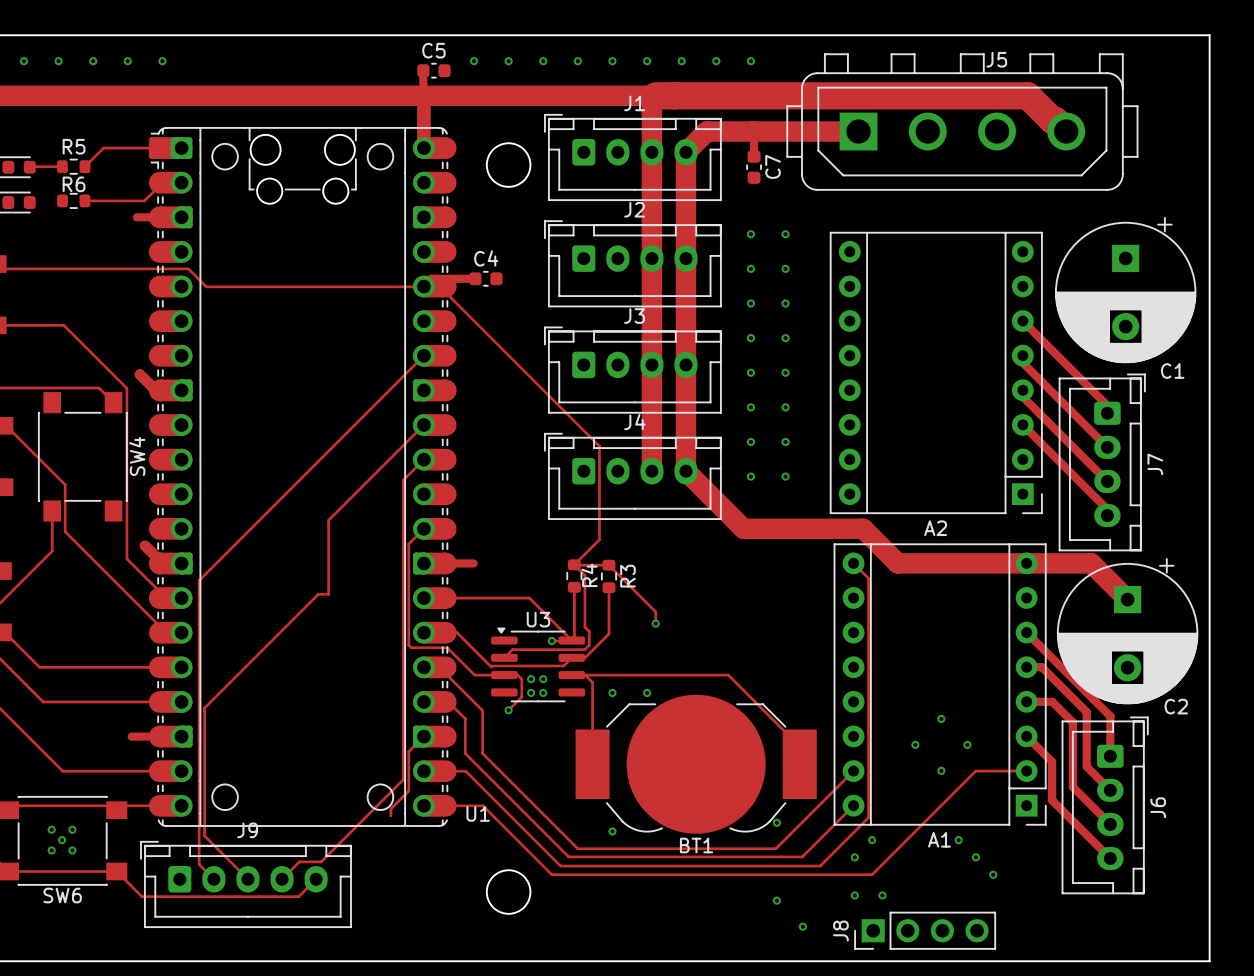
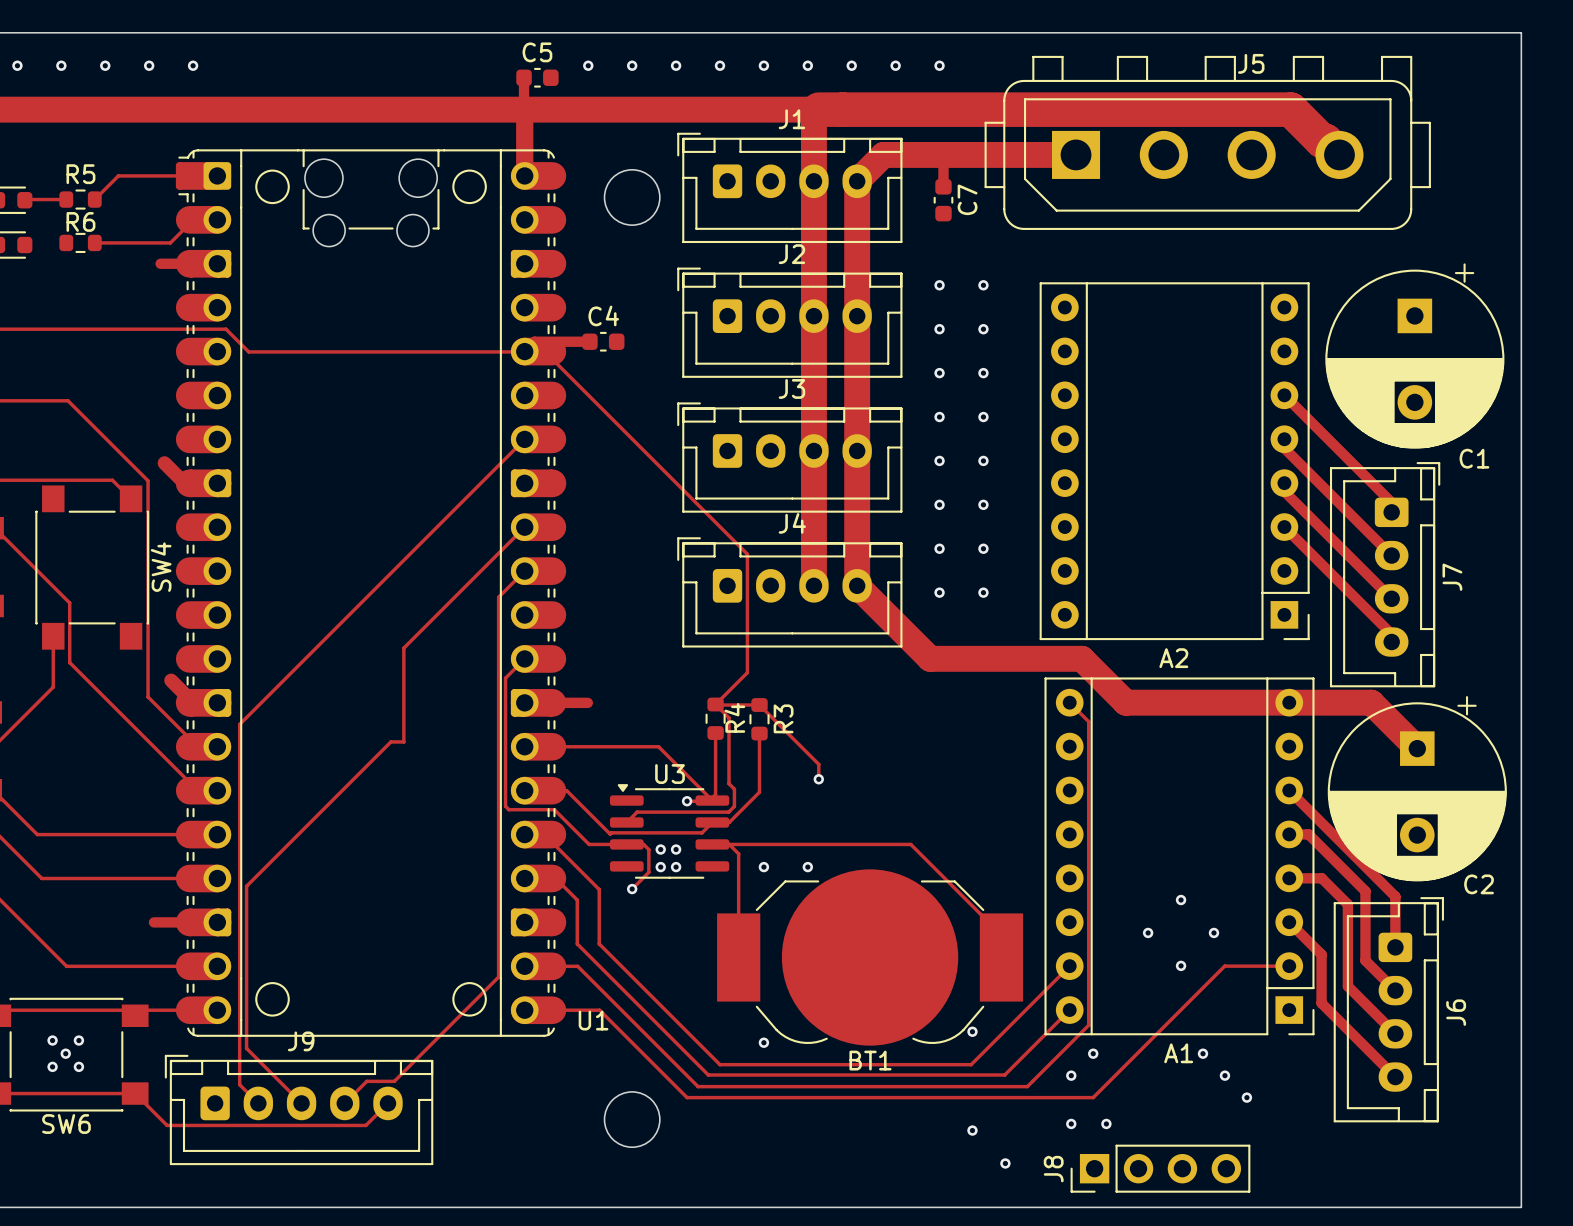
track: (423, 736) (408, 751) (408, 791) (390, 808) (390, 815) -> none

